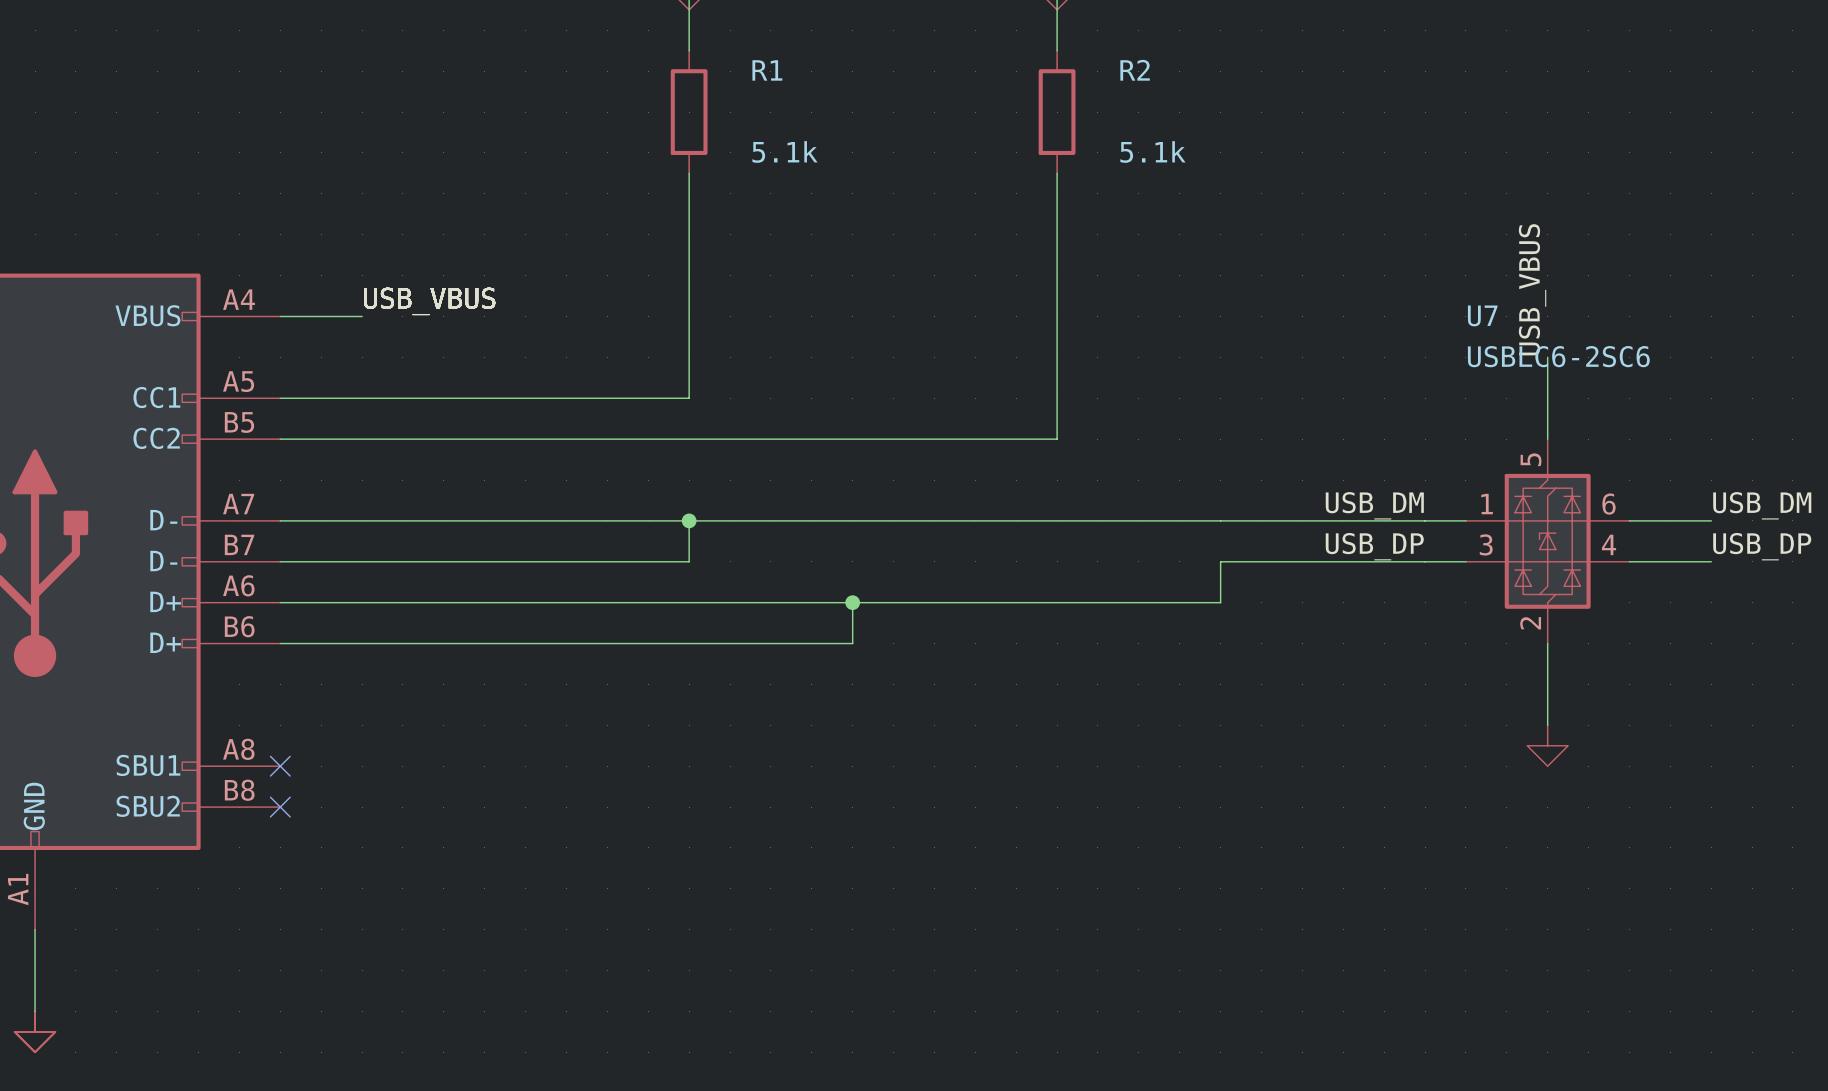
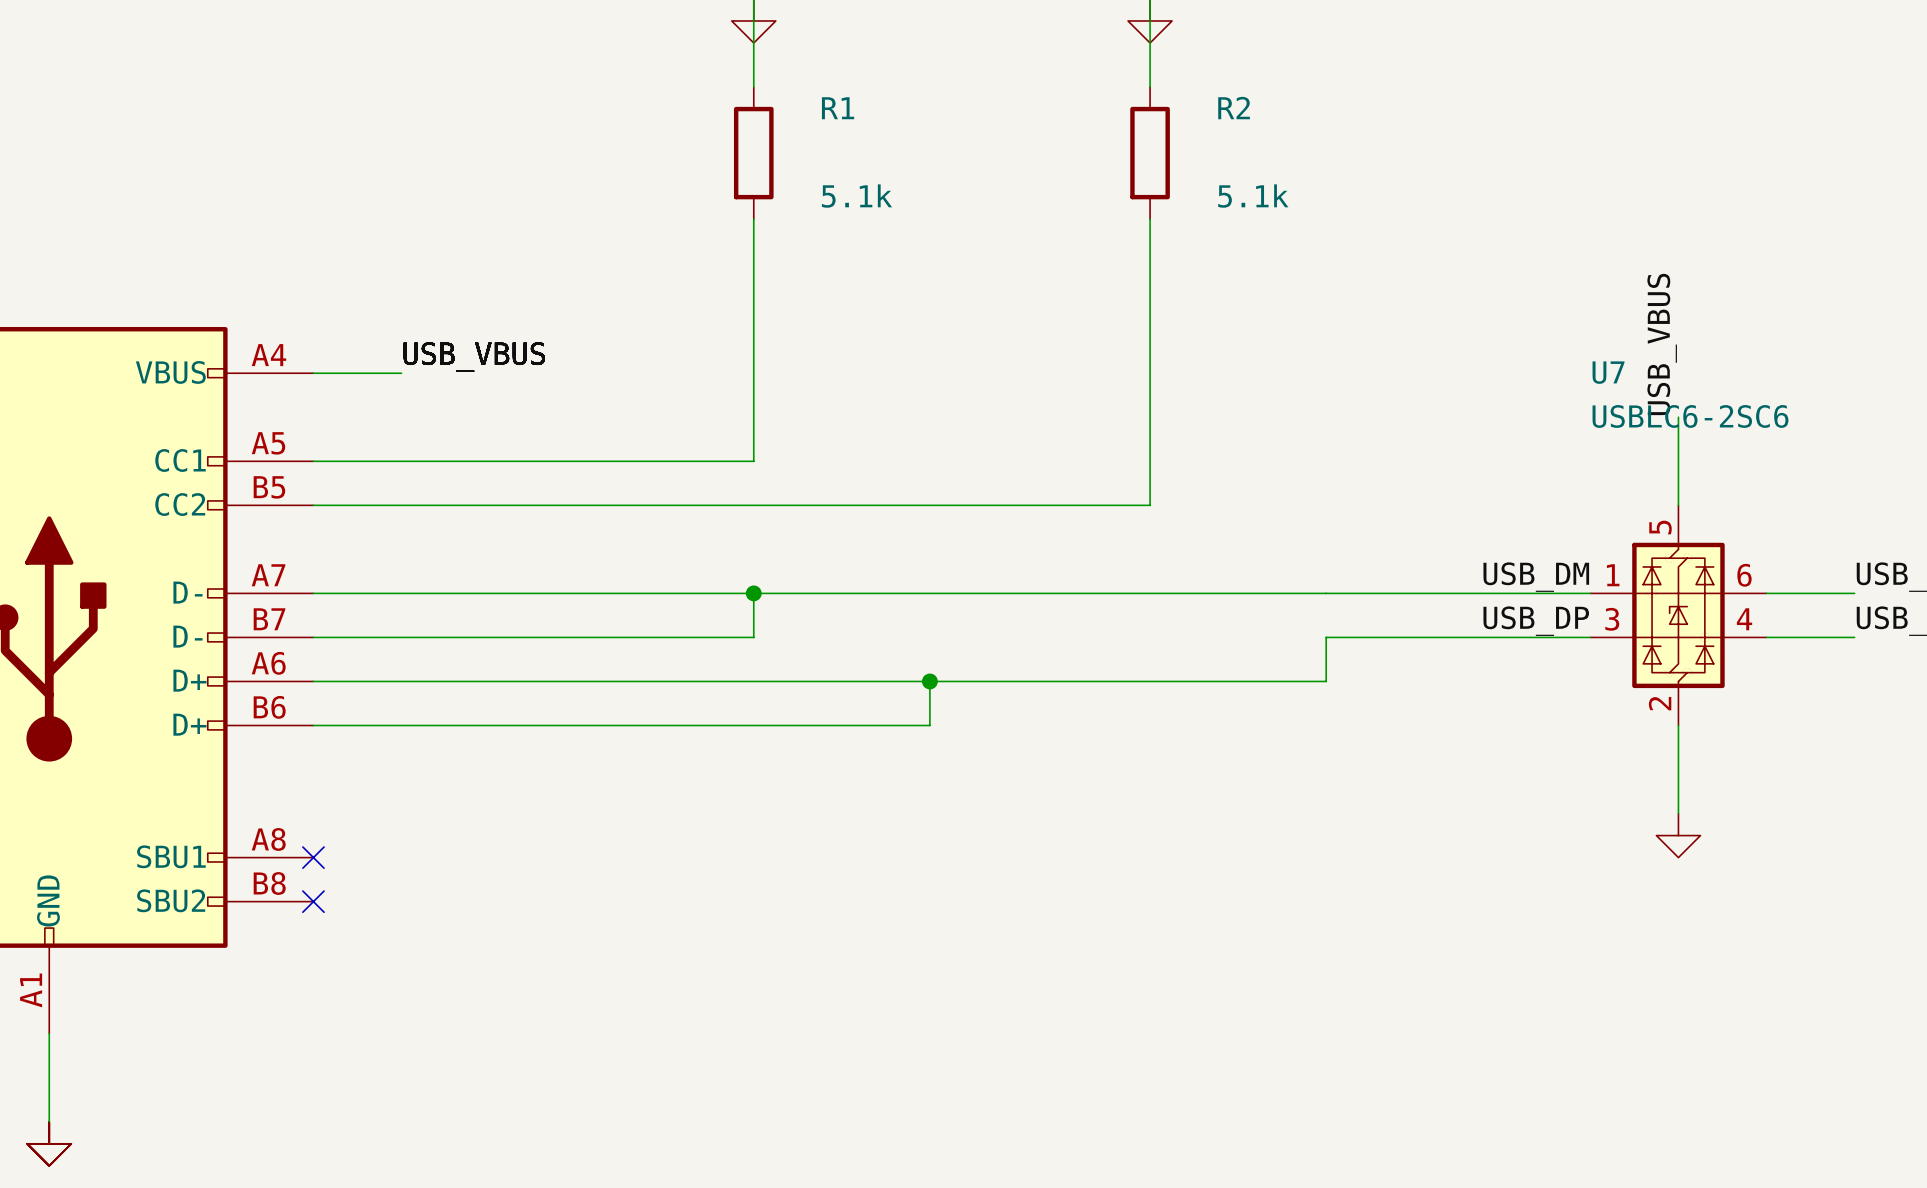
label position: USB_DM (1374, 505) -> USB_DM (1536, 577)
label position: USB_DP (1374, 546) -> USB_DP (1536, 621)

